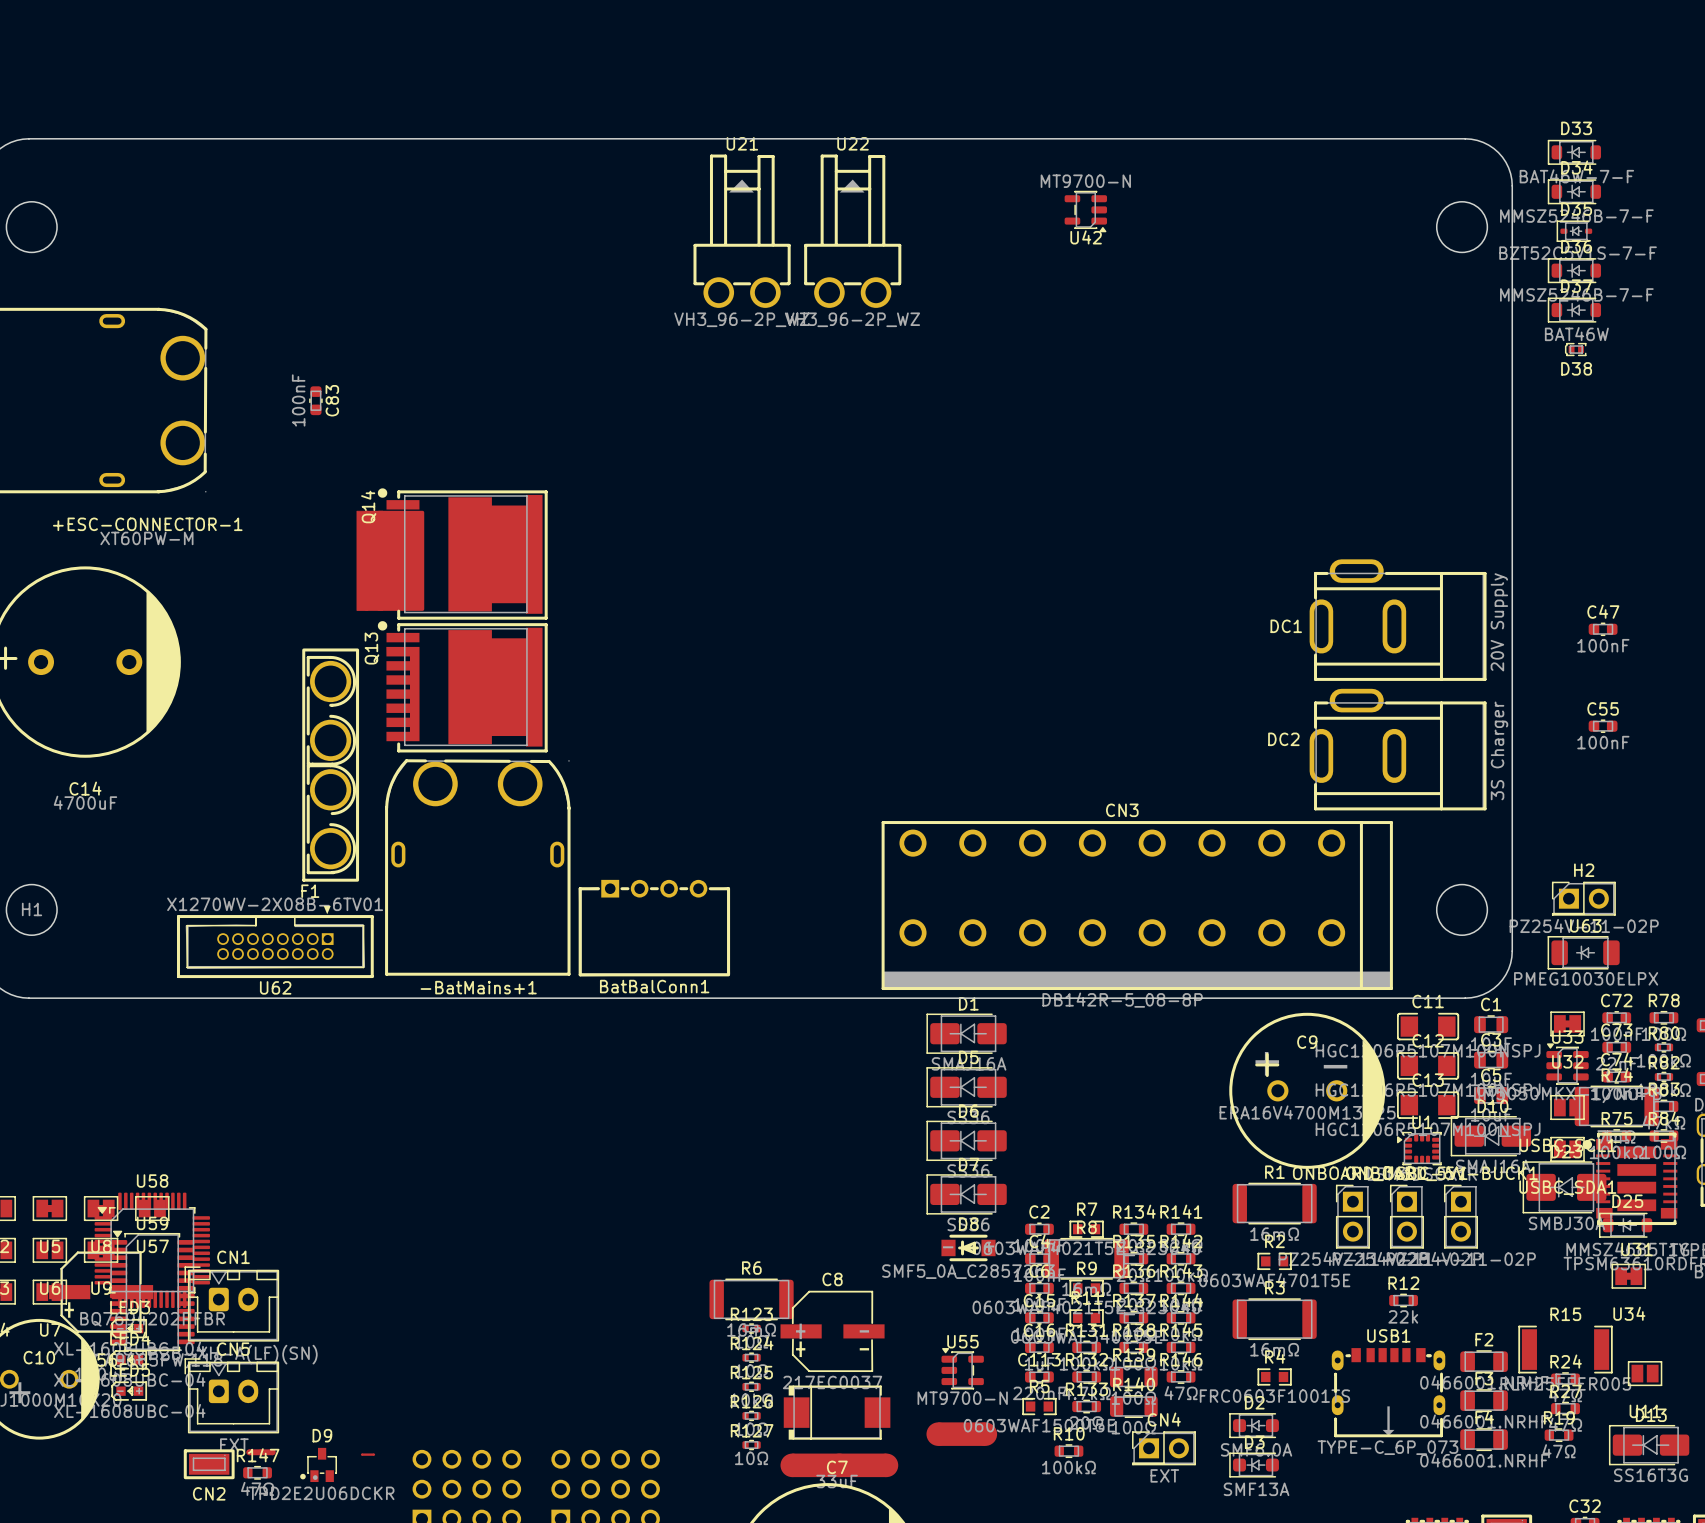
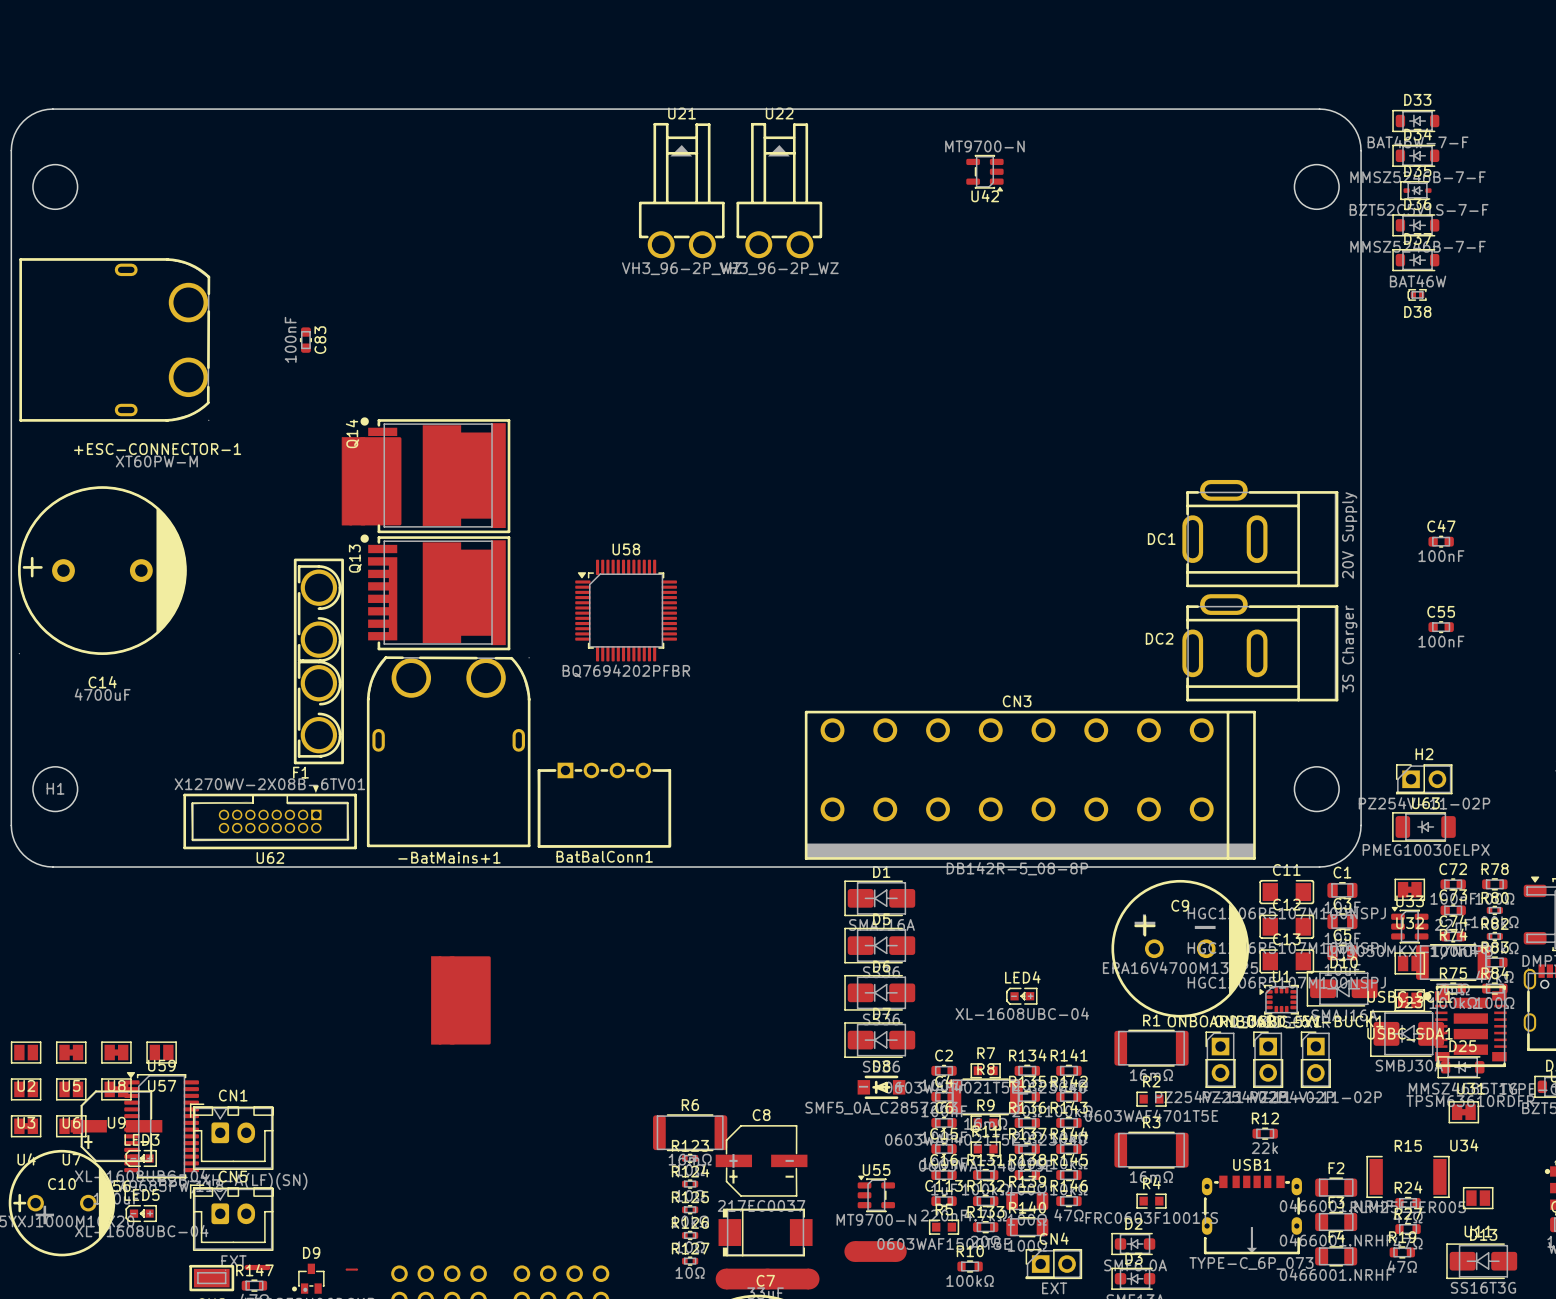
part: none -> (460, 1000)
U58 position: (152, 1250) -> (626, 610)
LED4 position: (129, 1359) -> (1021, 996)

